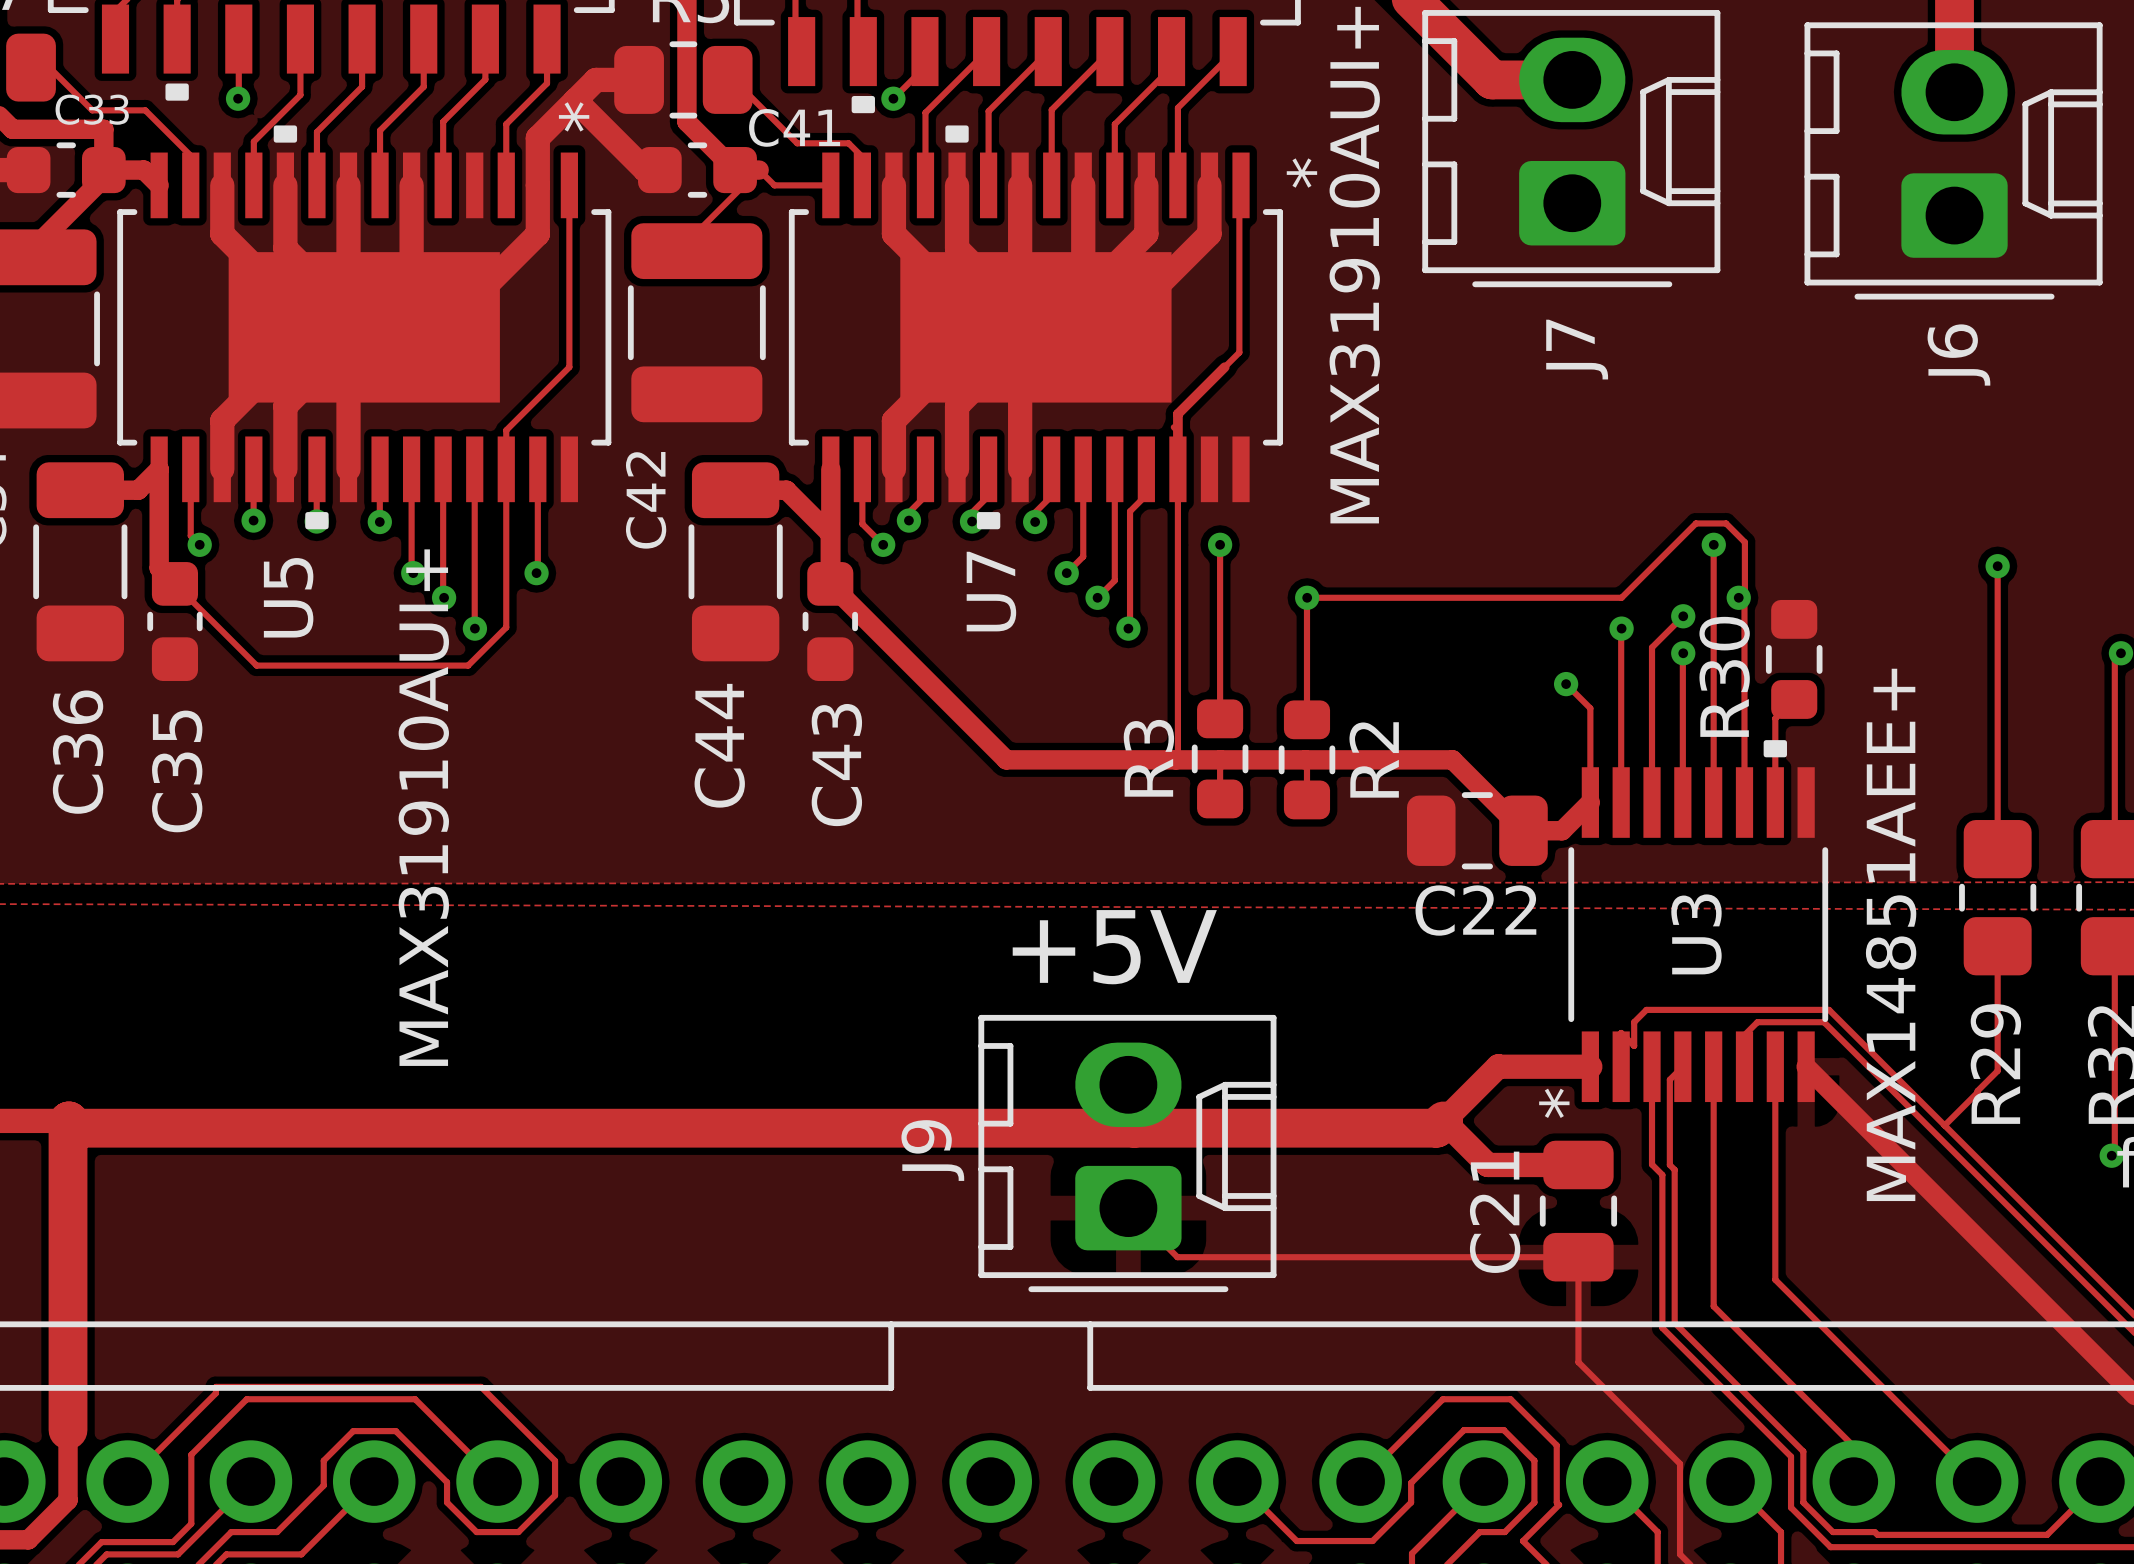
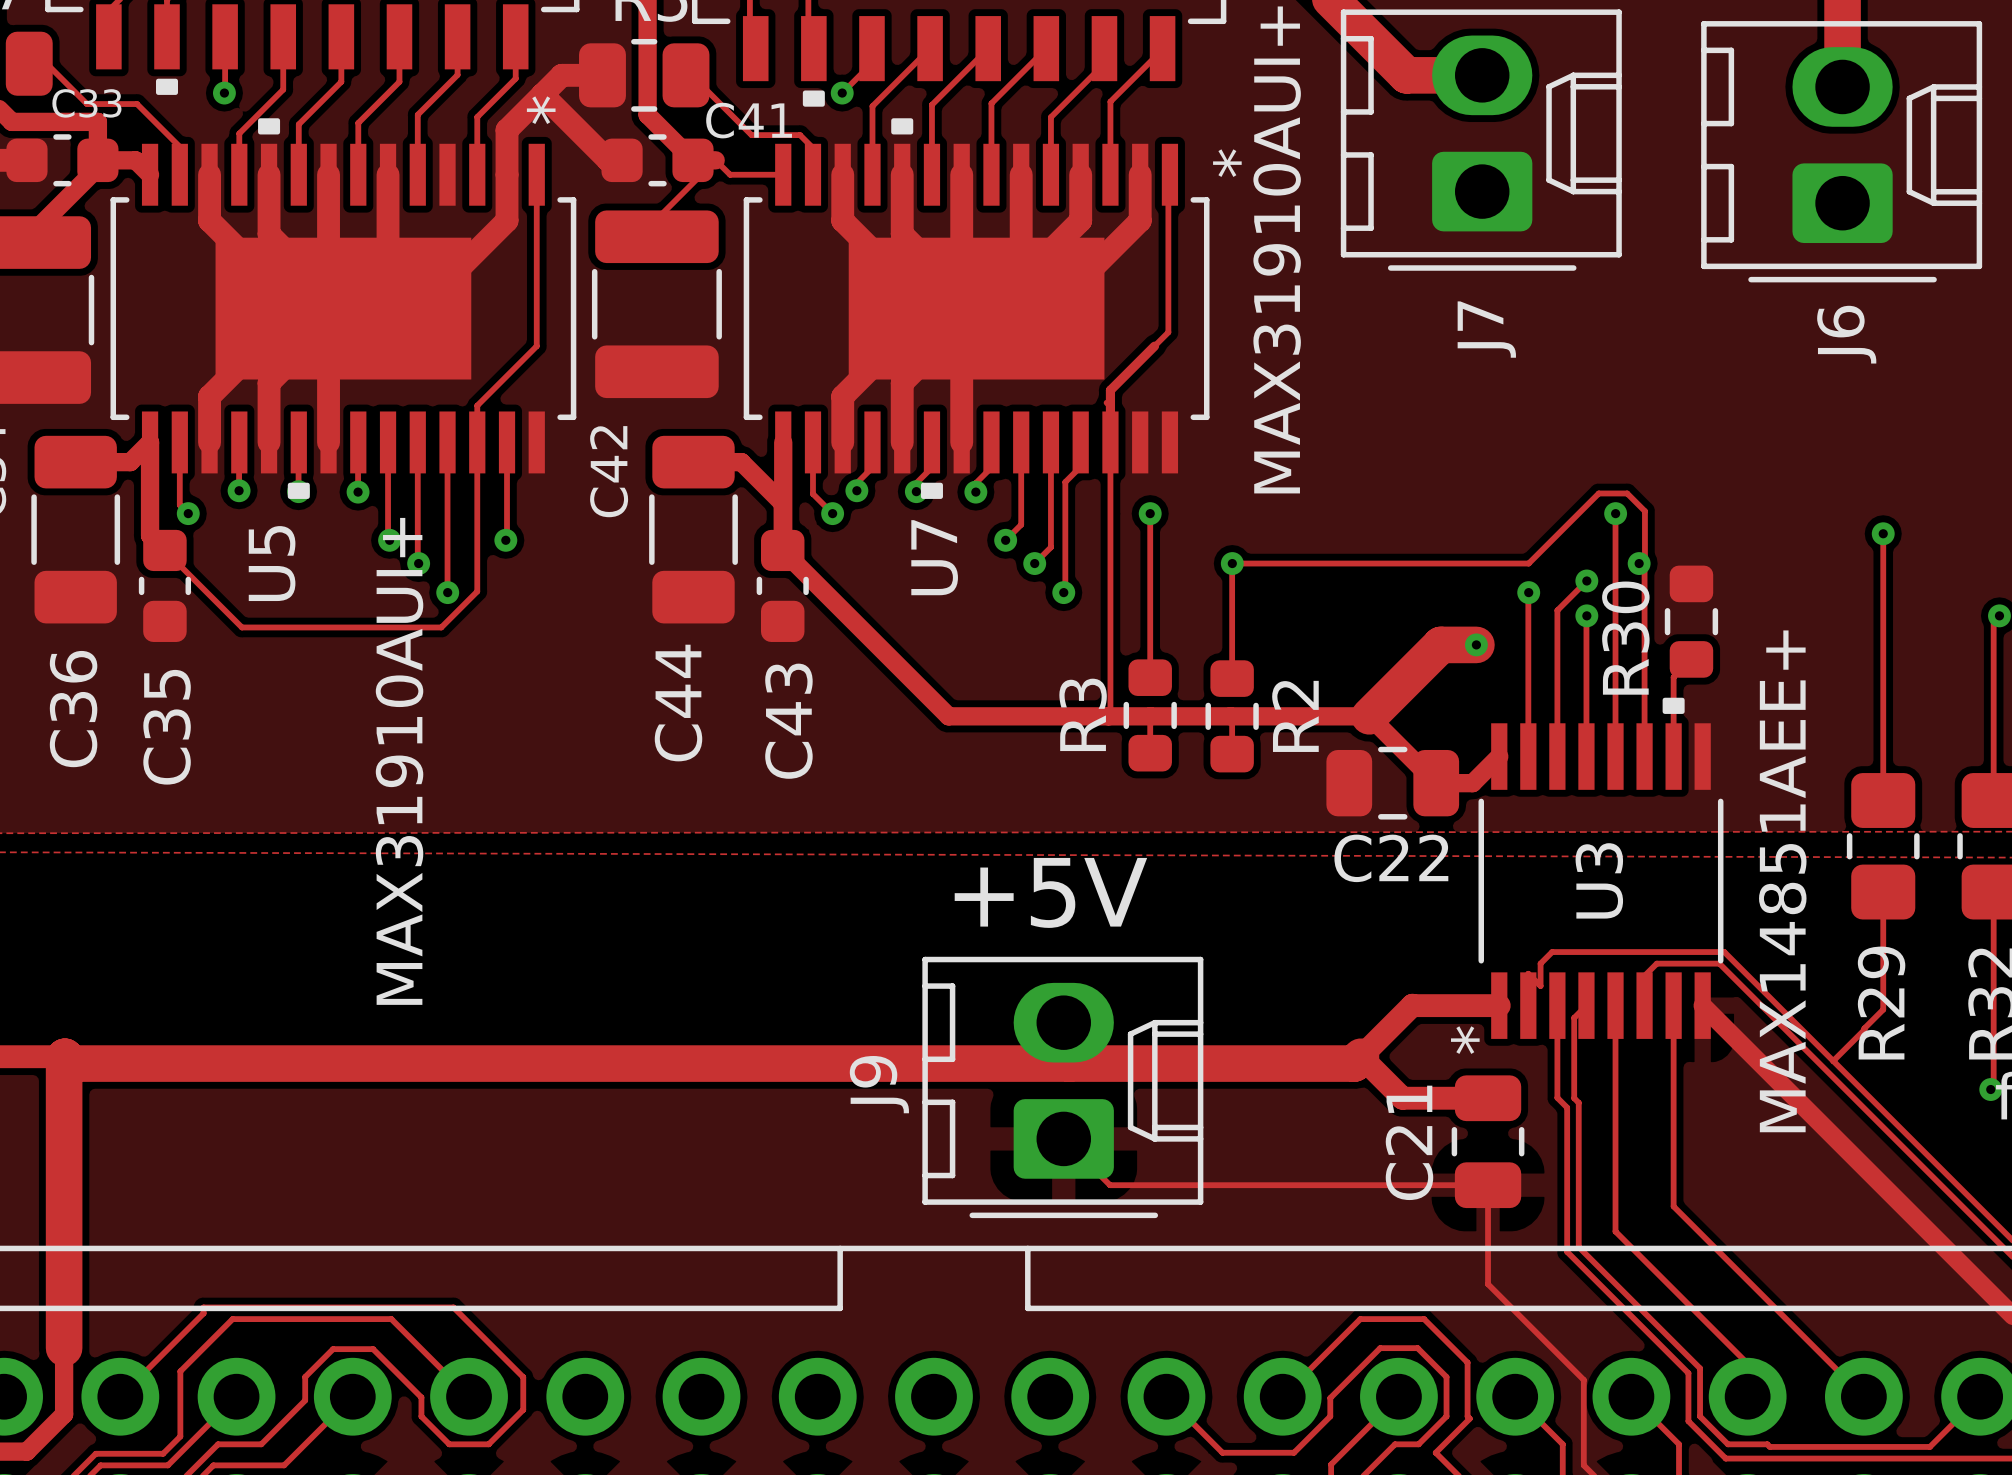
track: (1566, 684) (1590, 708) (1590, 802) -> (1476, 644) (1440, 644) (1369, 716)

